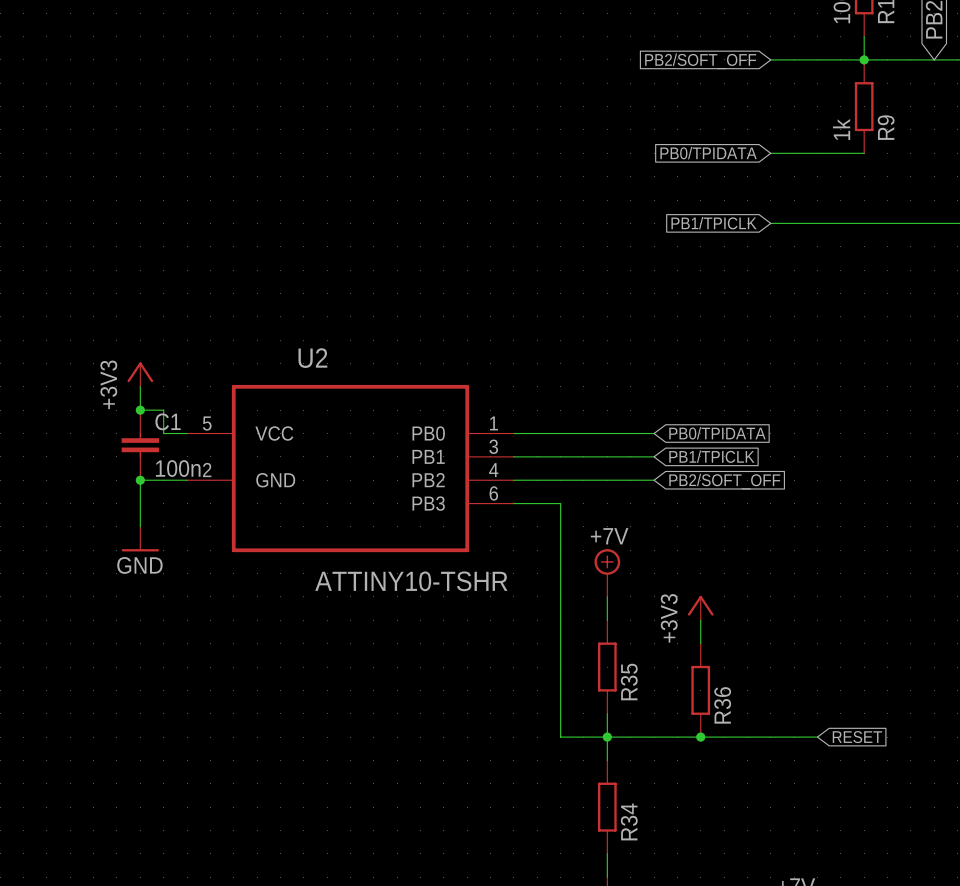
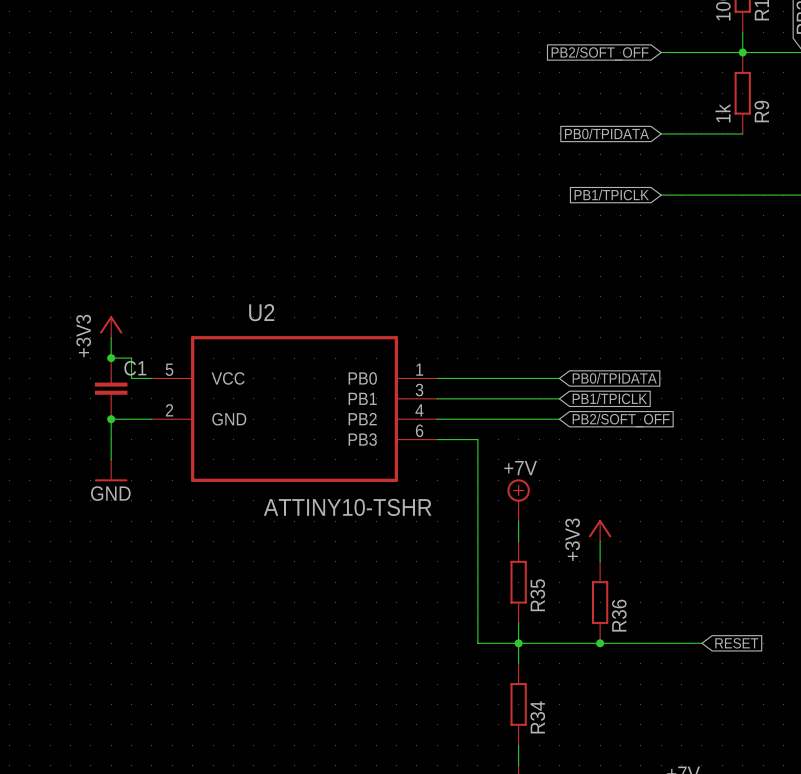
C1 value: 100n (178, 468) -> none

